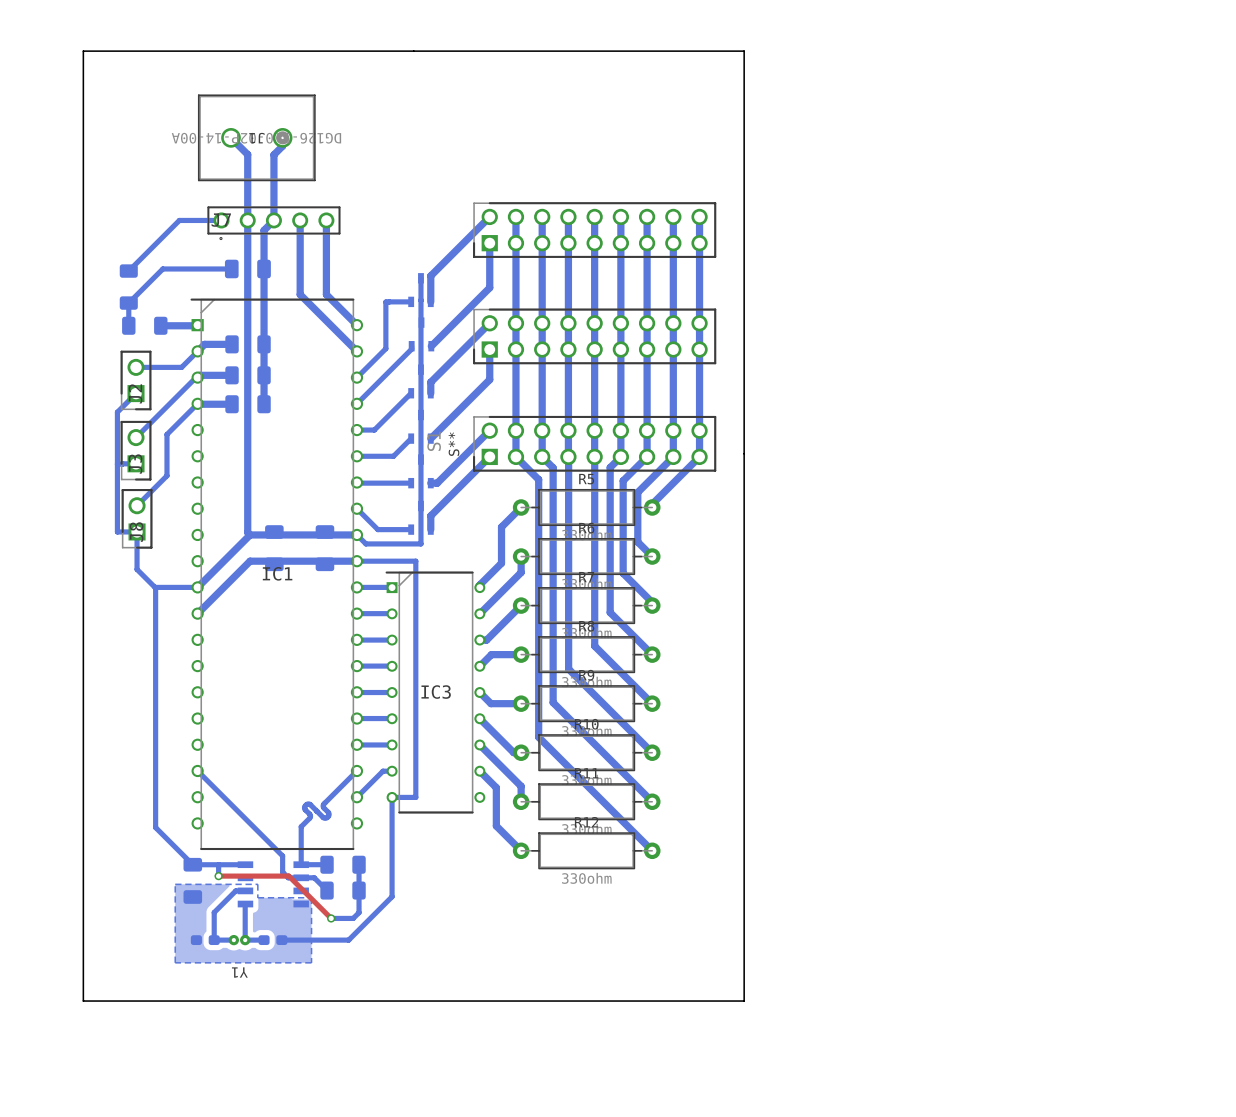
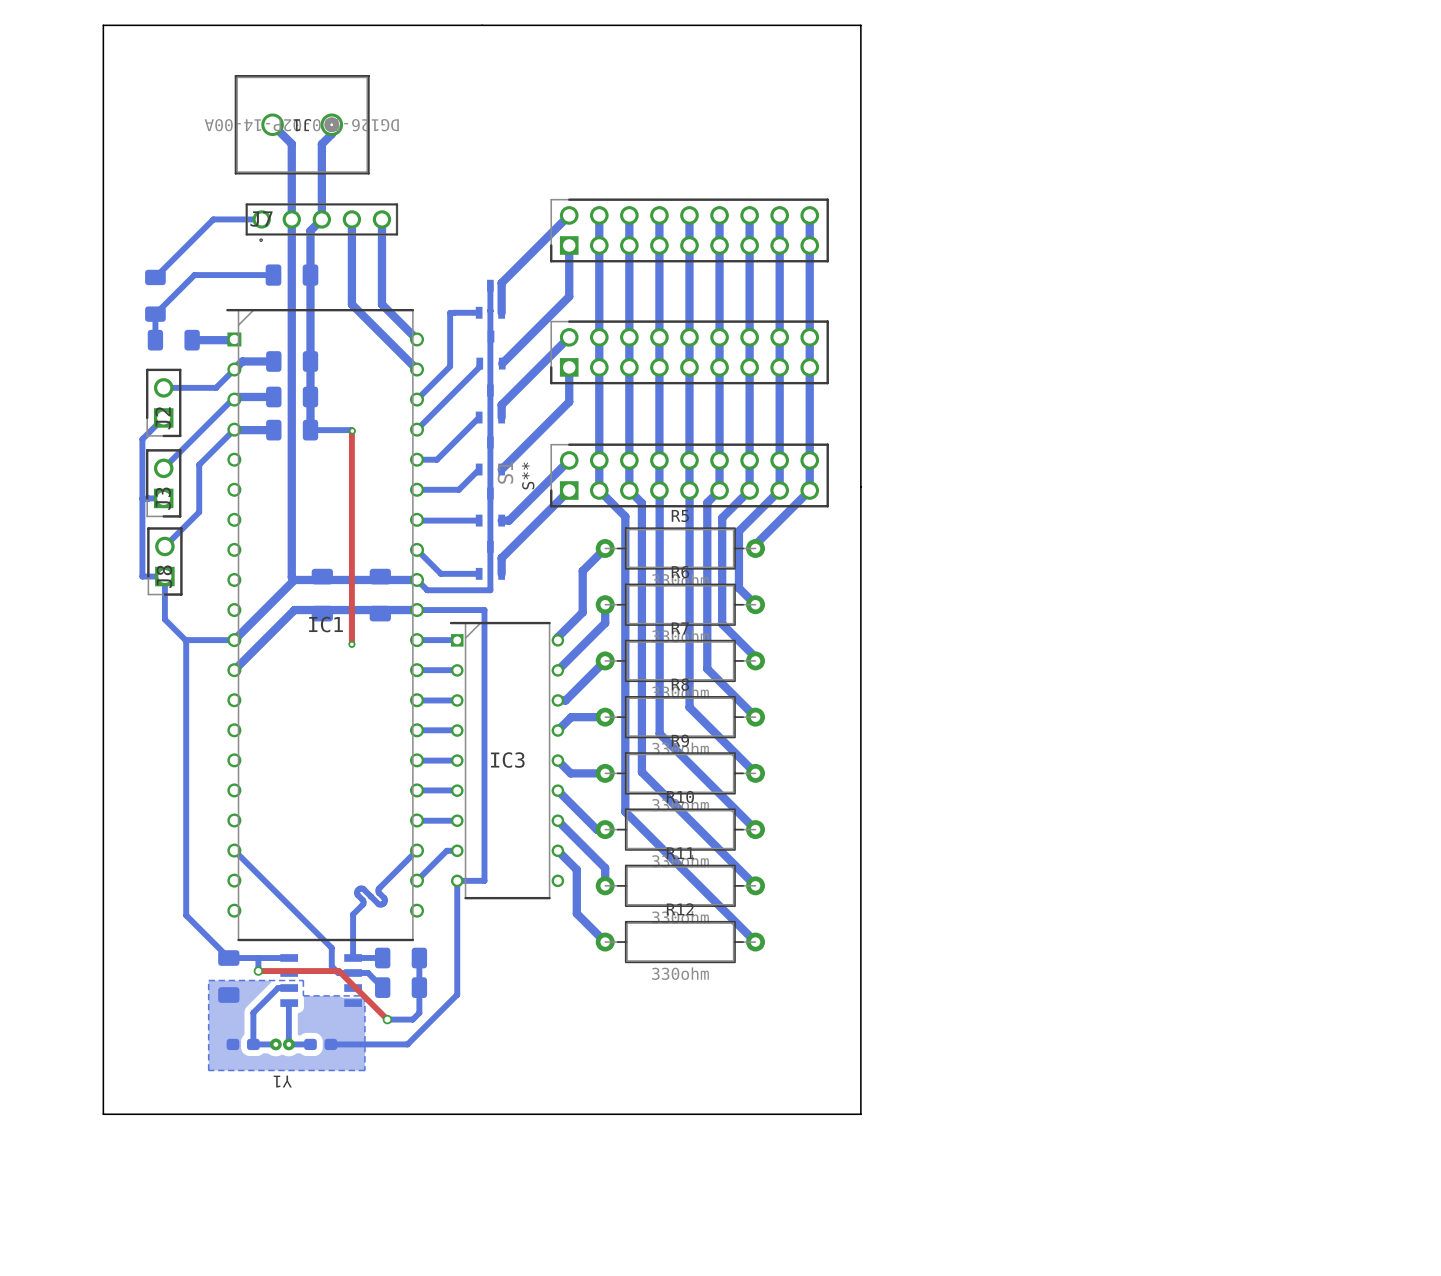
bottom track: none -> (310, 430) (352, 431)
top track: none -> (352, 431) (351, 644)
via: none -> (352, 431)
via: none -> (351, 644)

